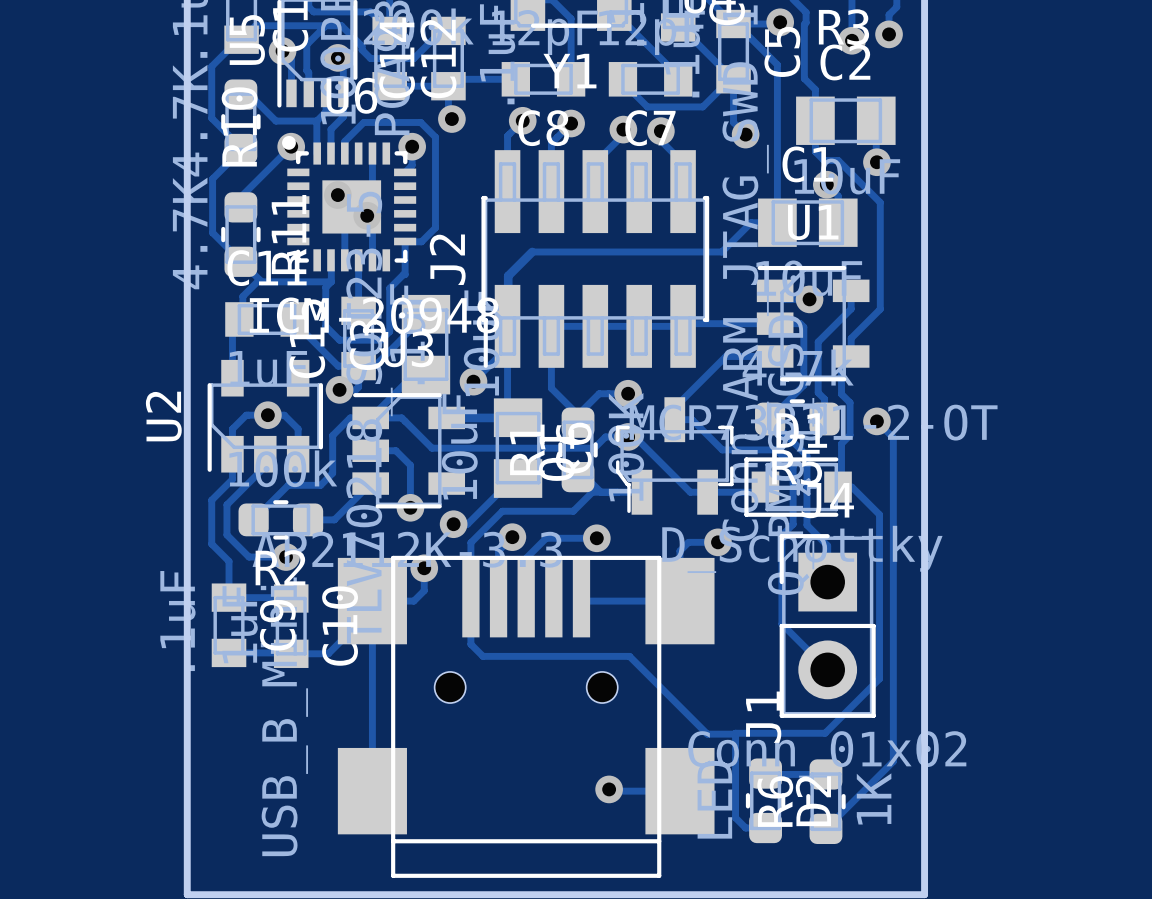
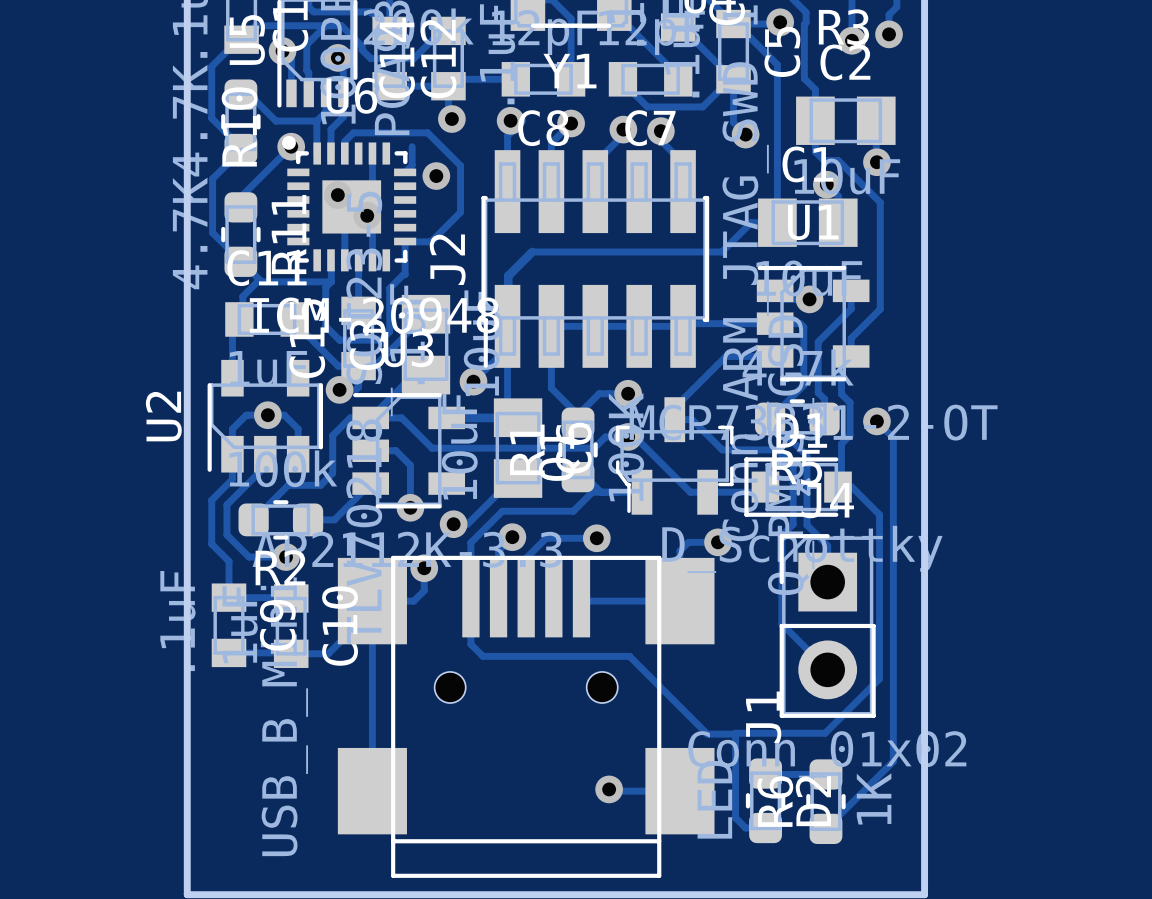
via position: (522, 120) -> (510, 120)
track: (353, 132) (363, 122) (420, 122) (435, 137) (435, 227) (421, 241) -> (353, 132) (427, 132) (460, 165) (460, 212) (431, 241) (421, 241)
via position: (412, 146) -> (436, 176)

